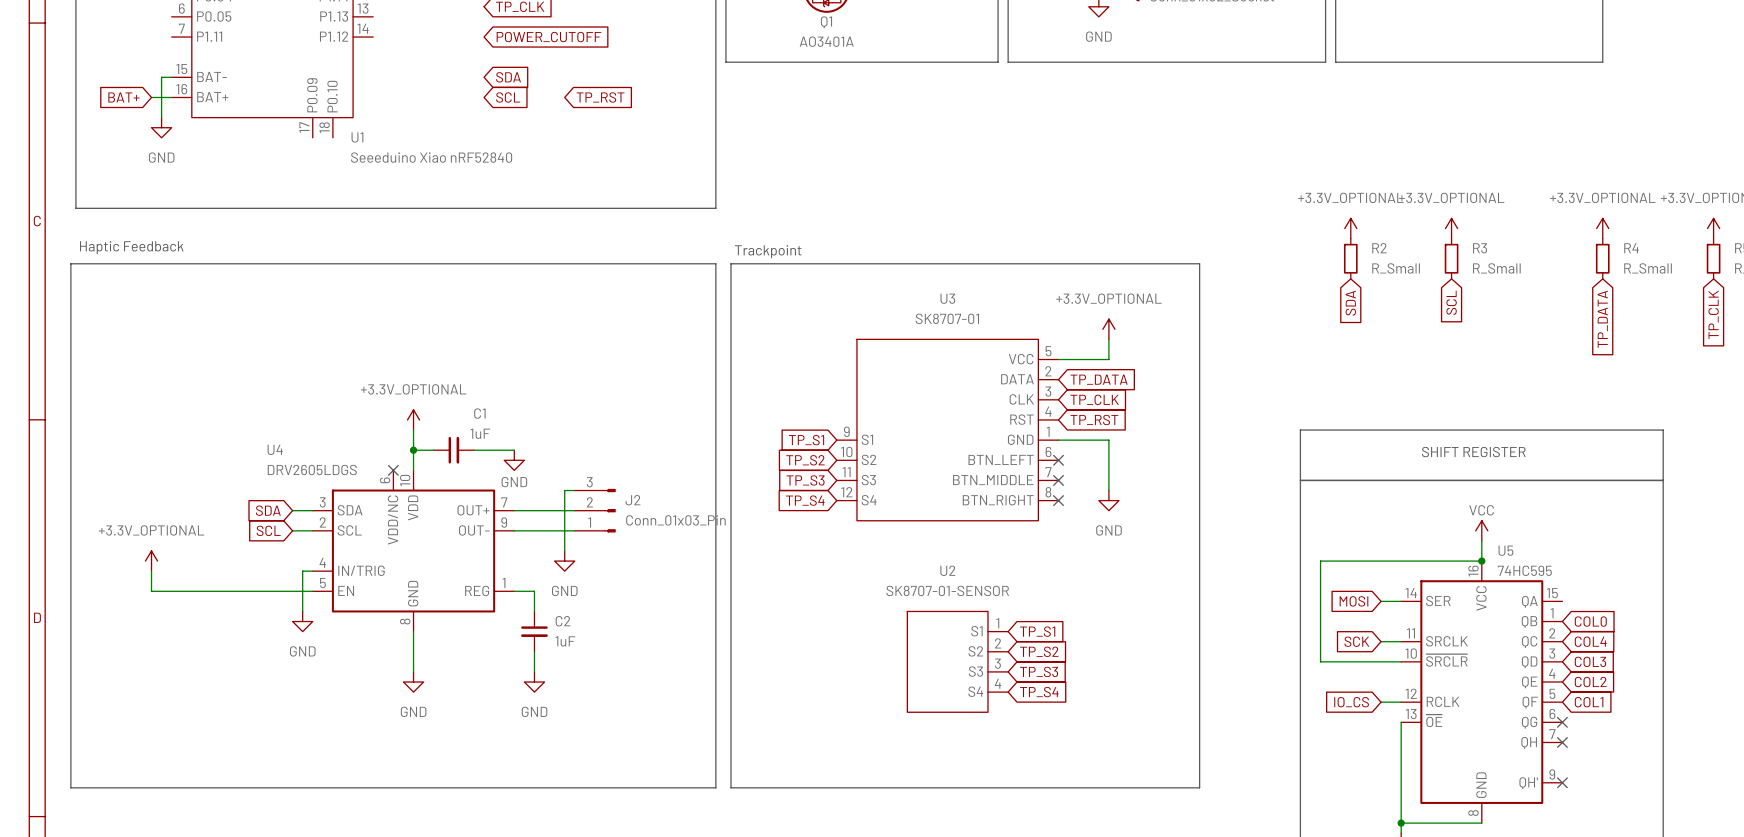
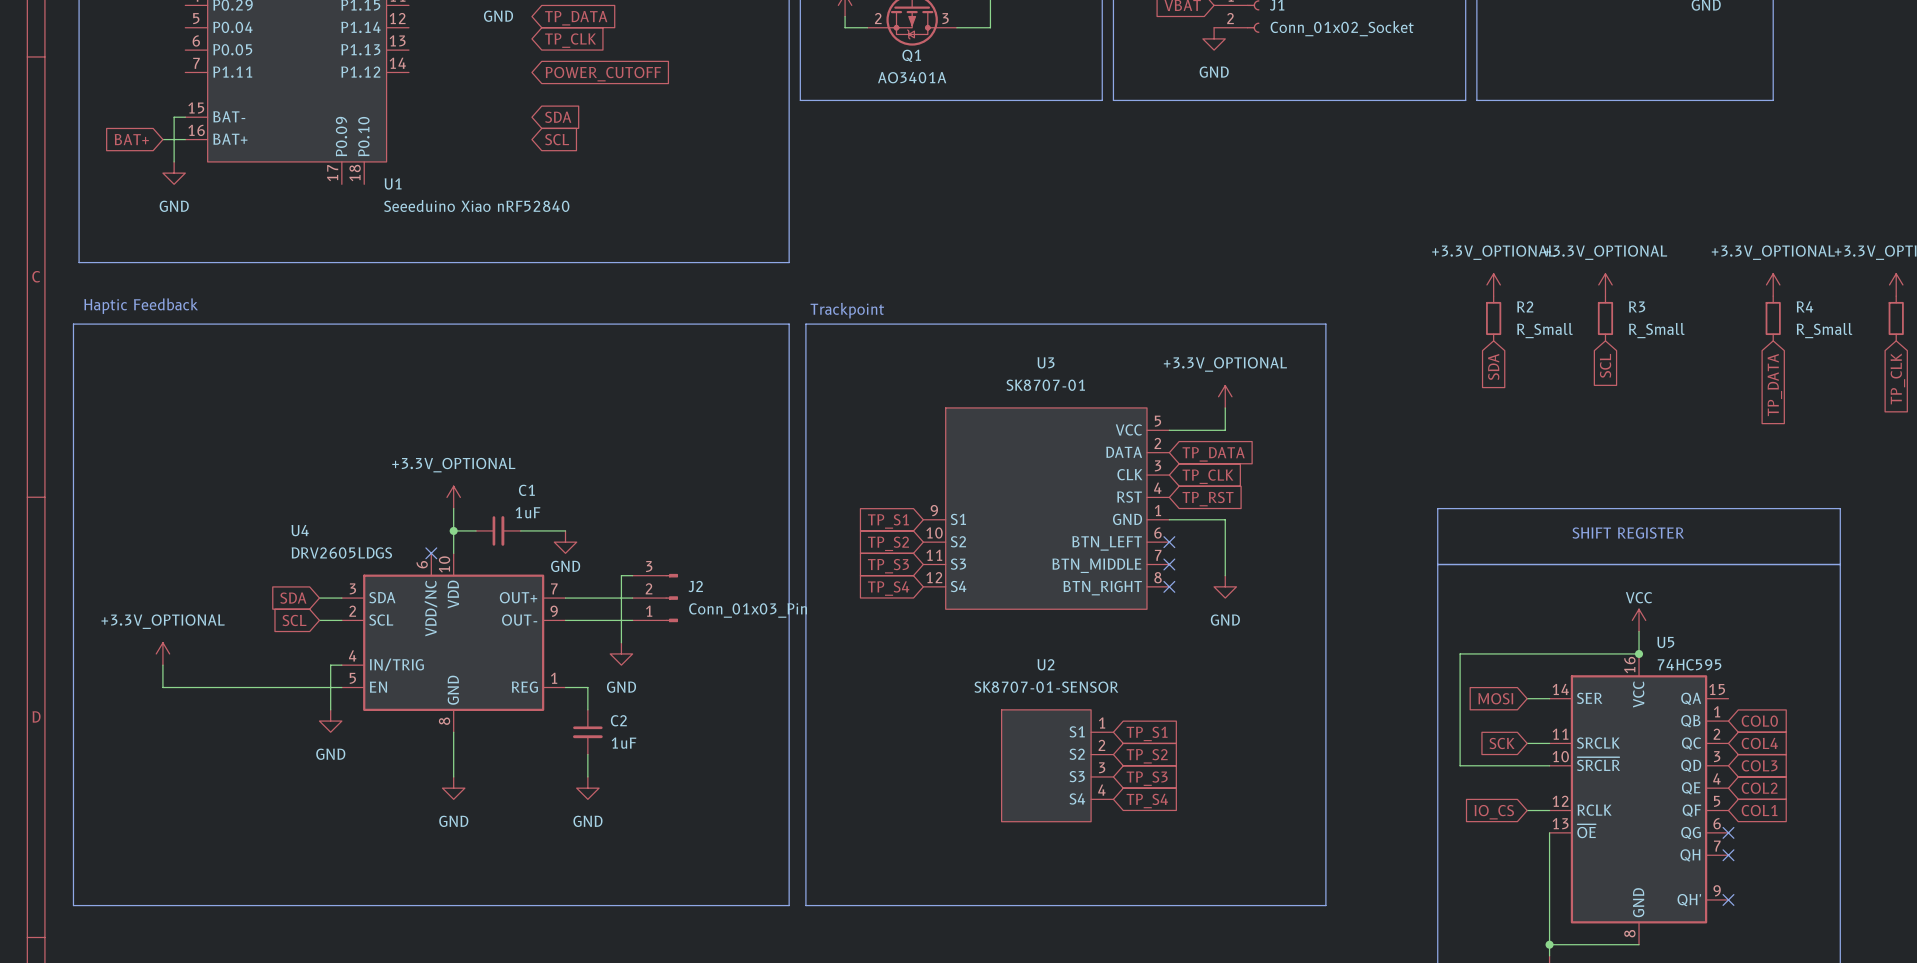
global label: TP_RST (600, 97) -> none

